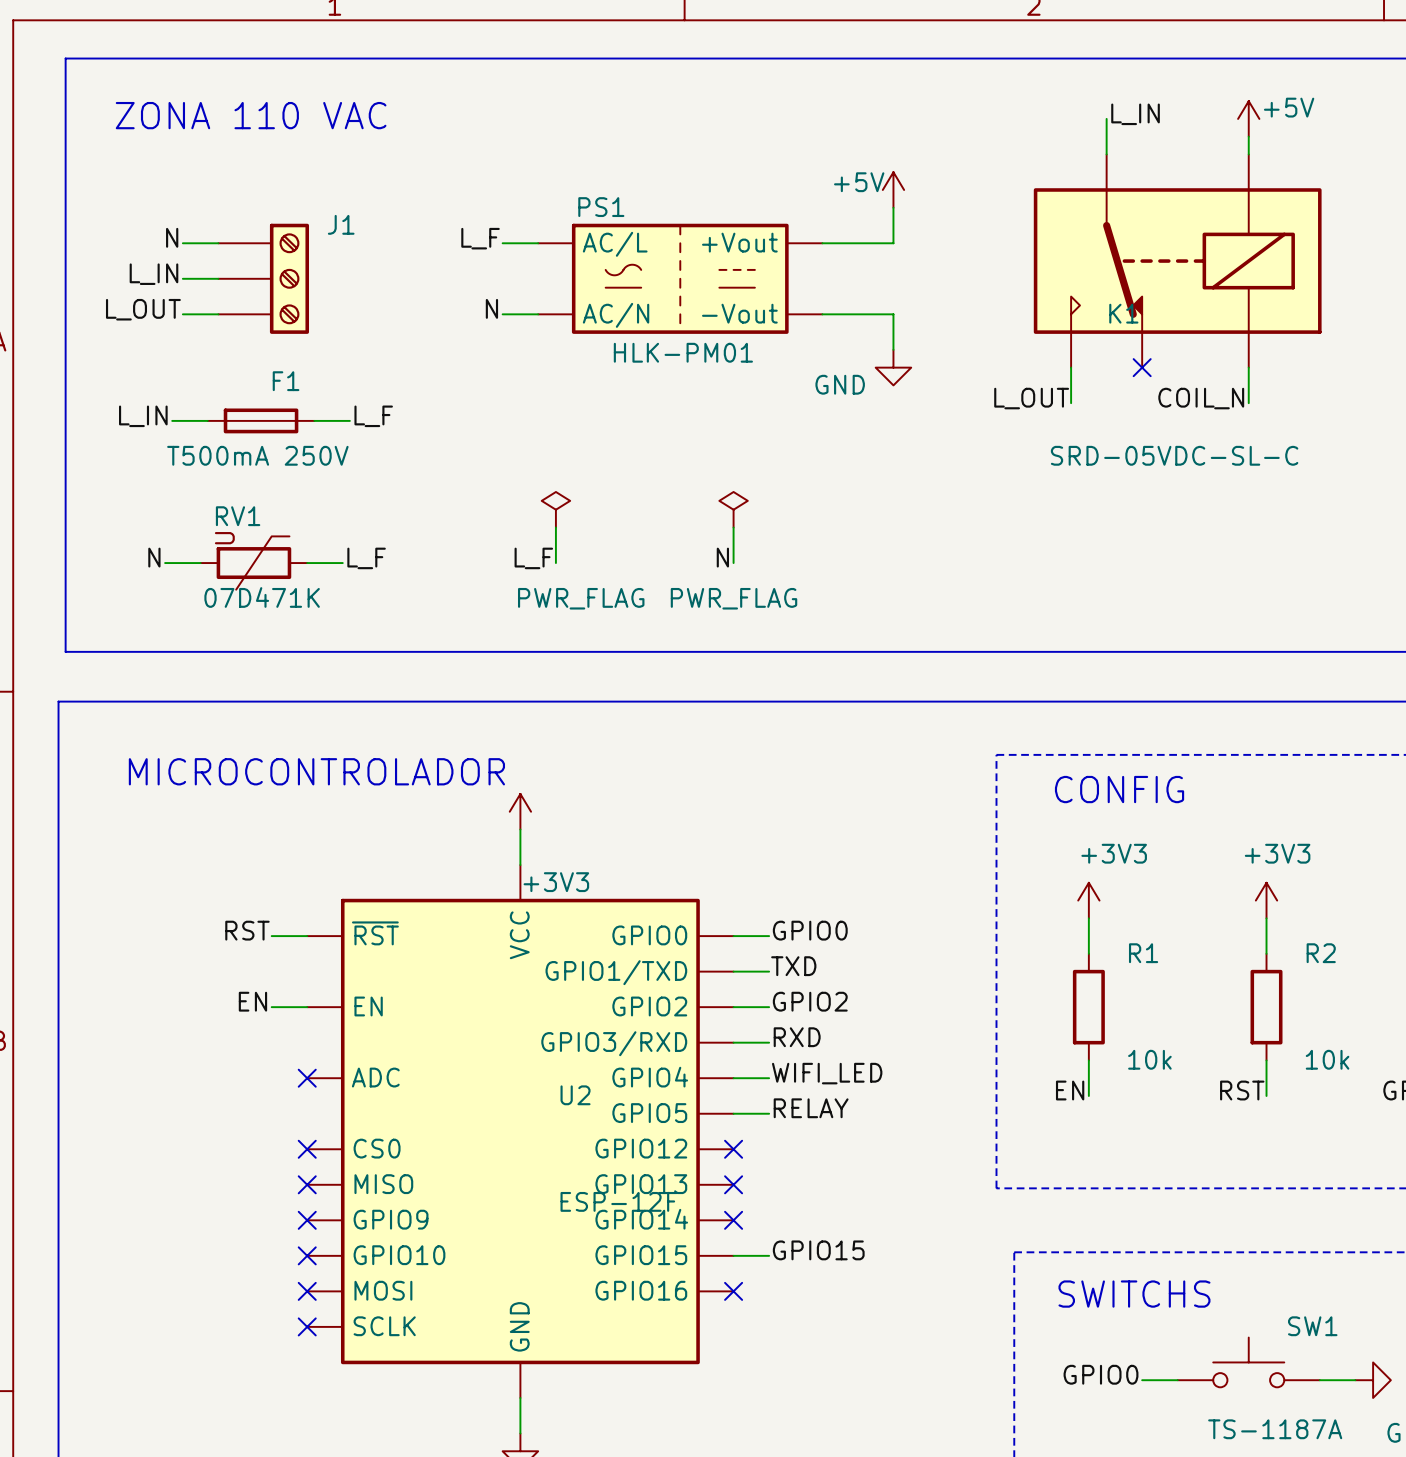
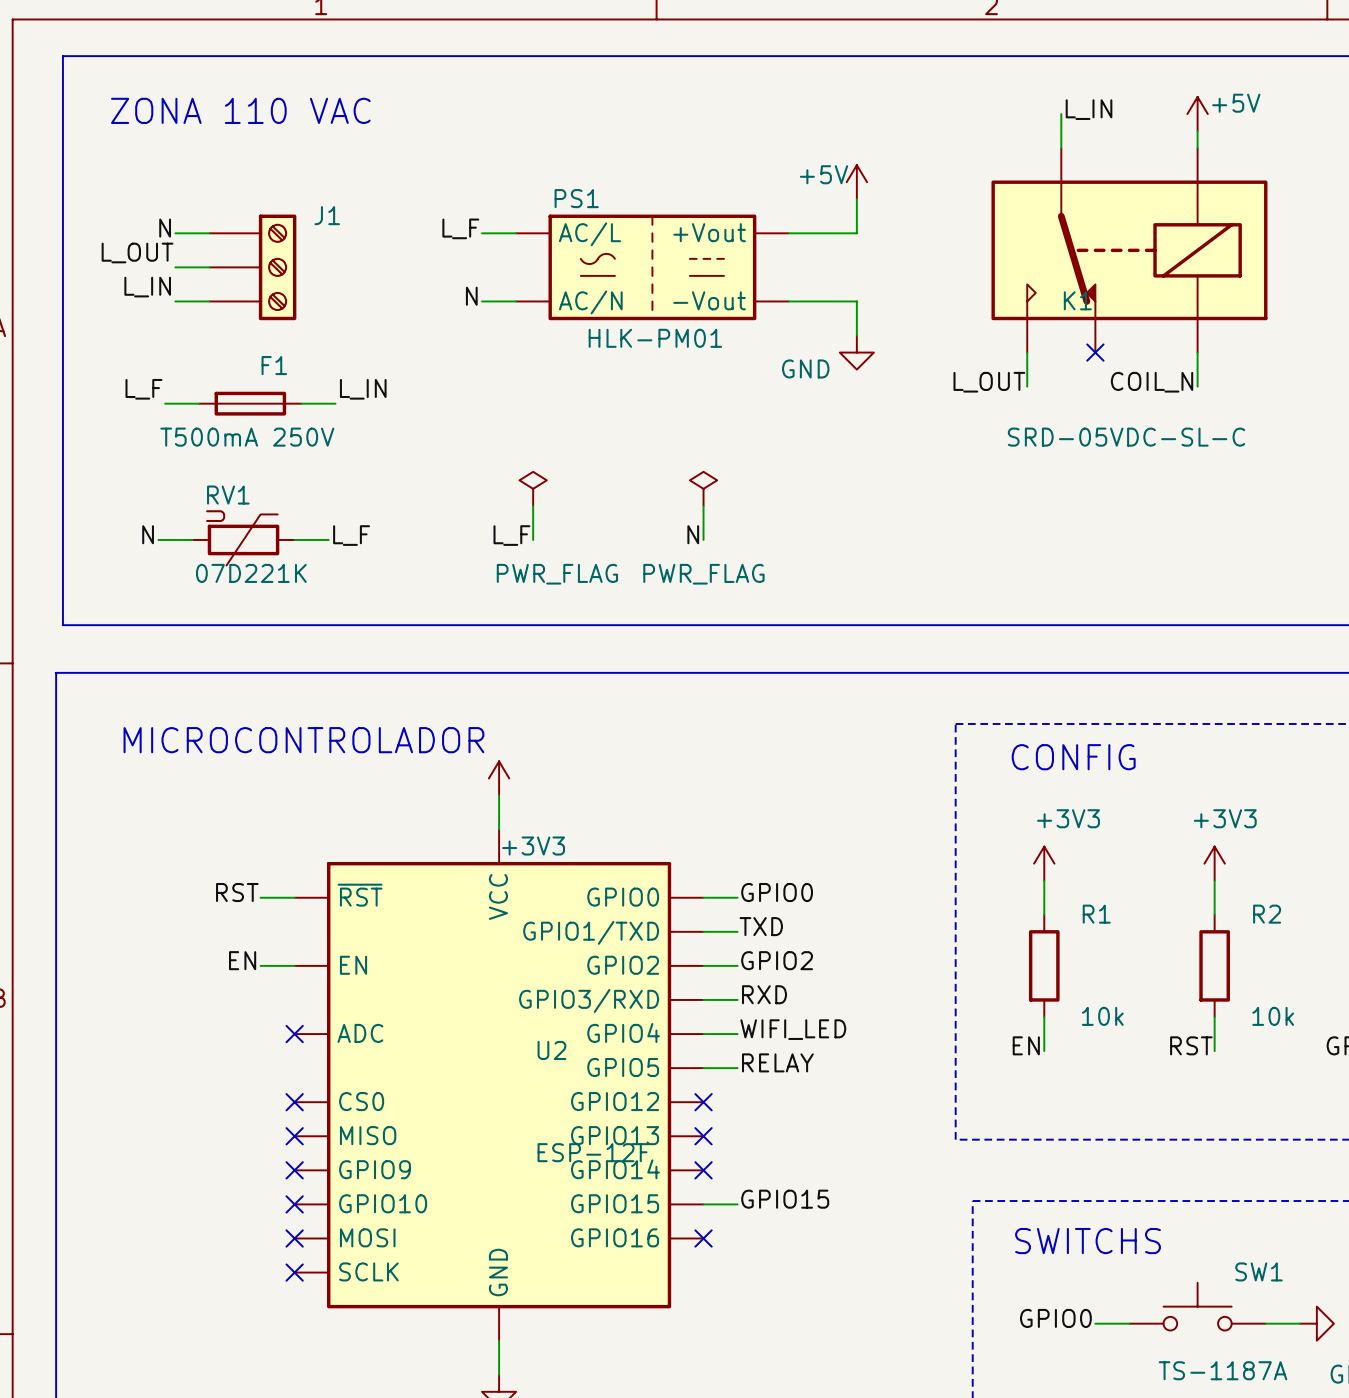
label: L_IN (153, 274) -> L_OUT (137, 252)
label: L_OUT (143, 309) -> L_IN (147, 287)
label: L_IN (143, 416) -> L_F (143, 389)
label: L_F (373, 416) -> L_IN (363, 389)
RV1 value: 07D471K (262, 597) -> 07D221K (251, 573)

